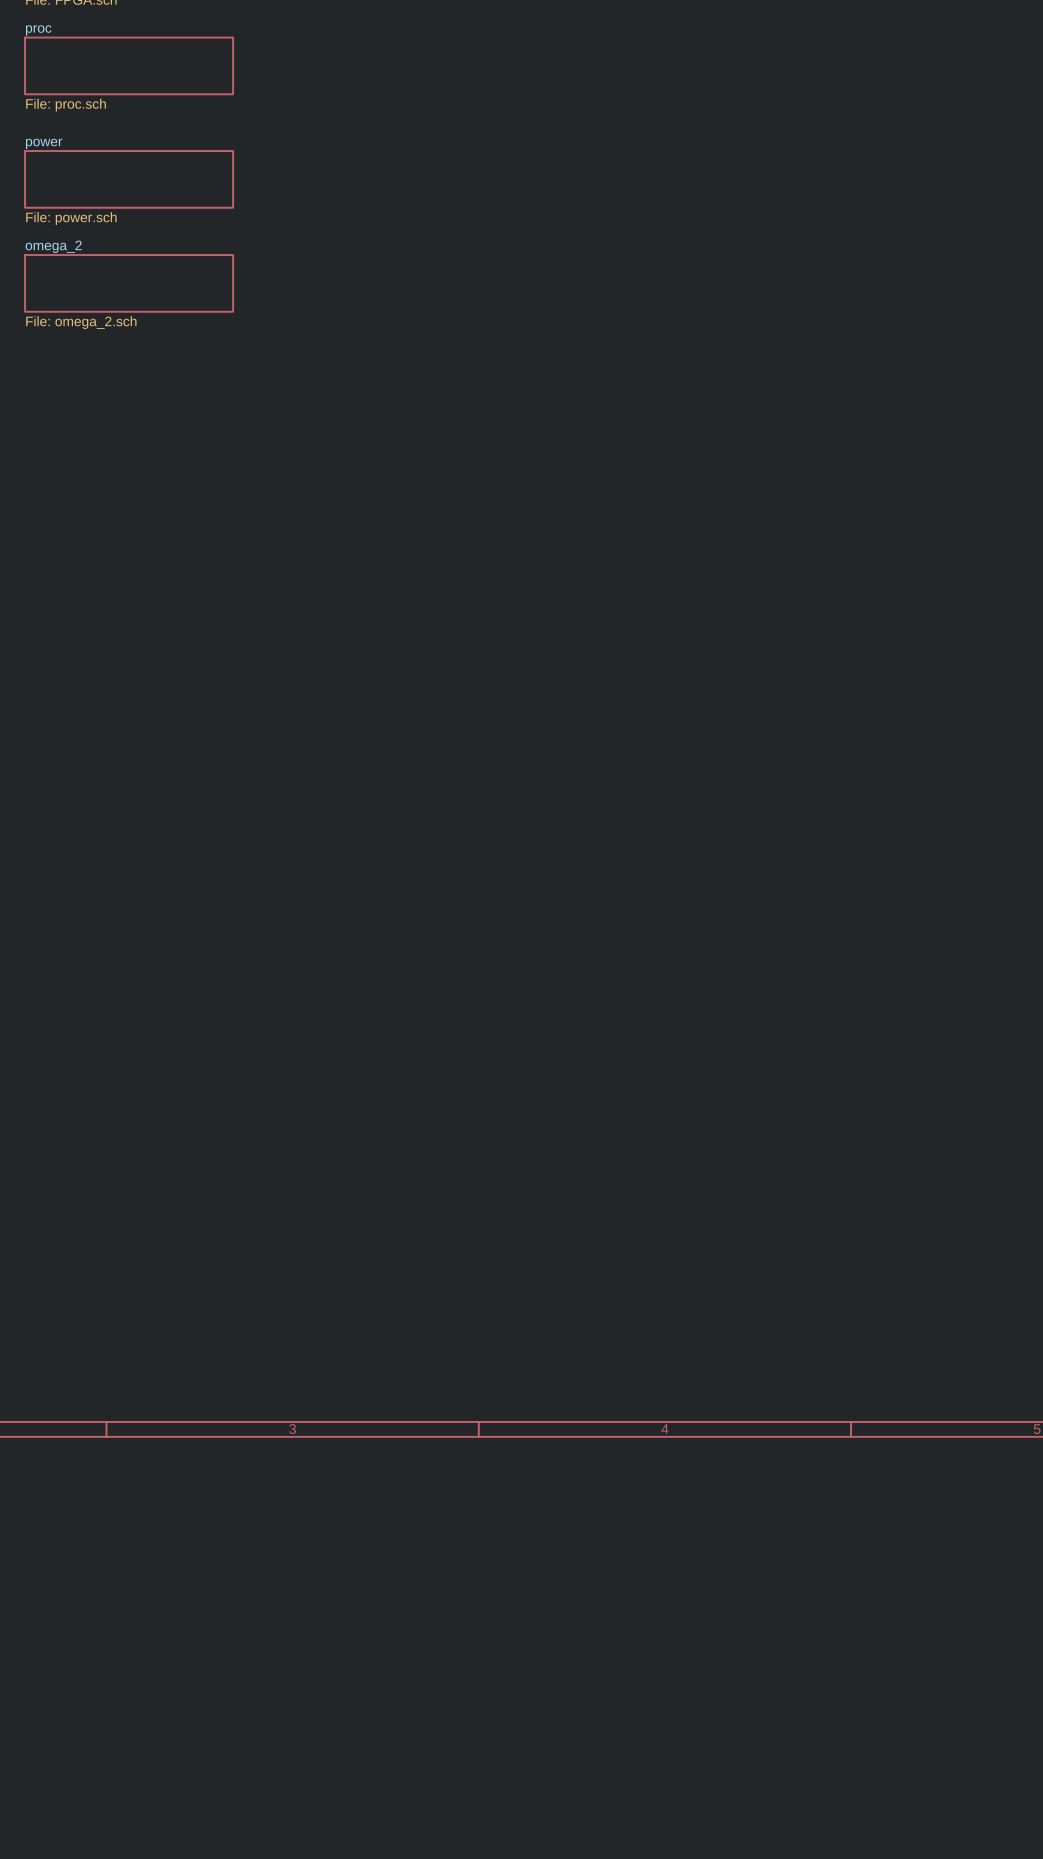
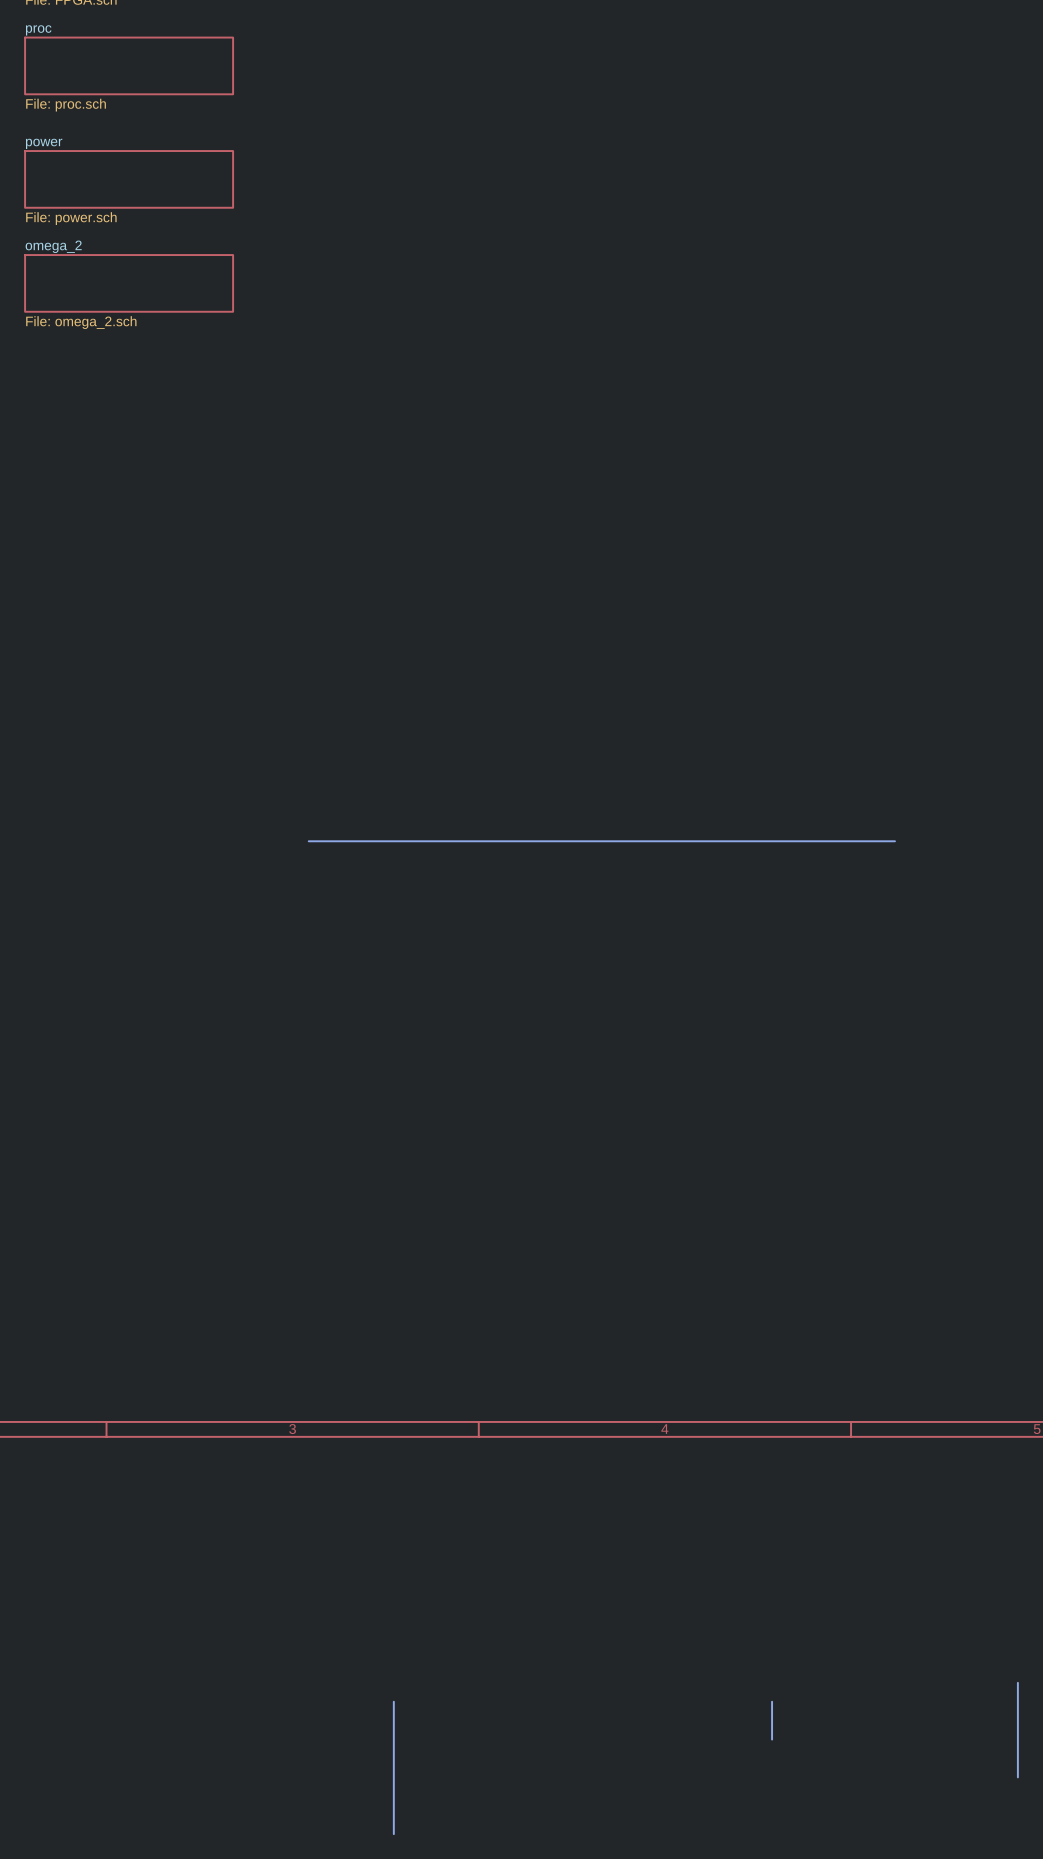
bus: none -> (308, 841) (894, 841)
bus: none -> (1017, 1682) (1017, 1777)
bus: none -> (393, 1701) (393, 1834)
bus: none -> (772, 1701) (772, 1739)

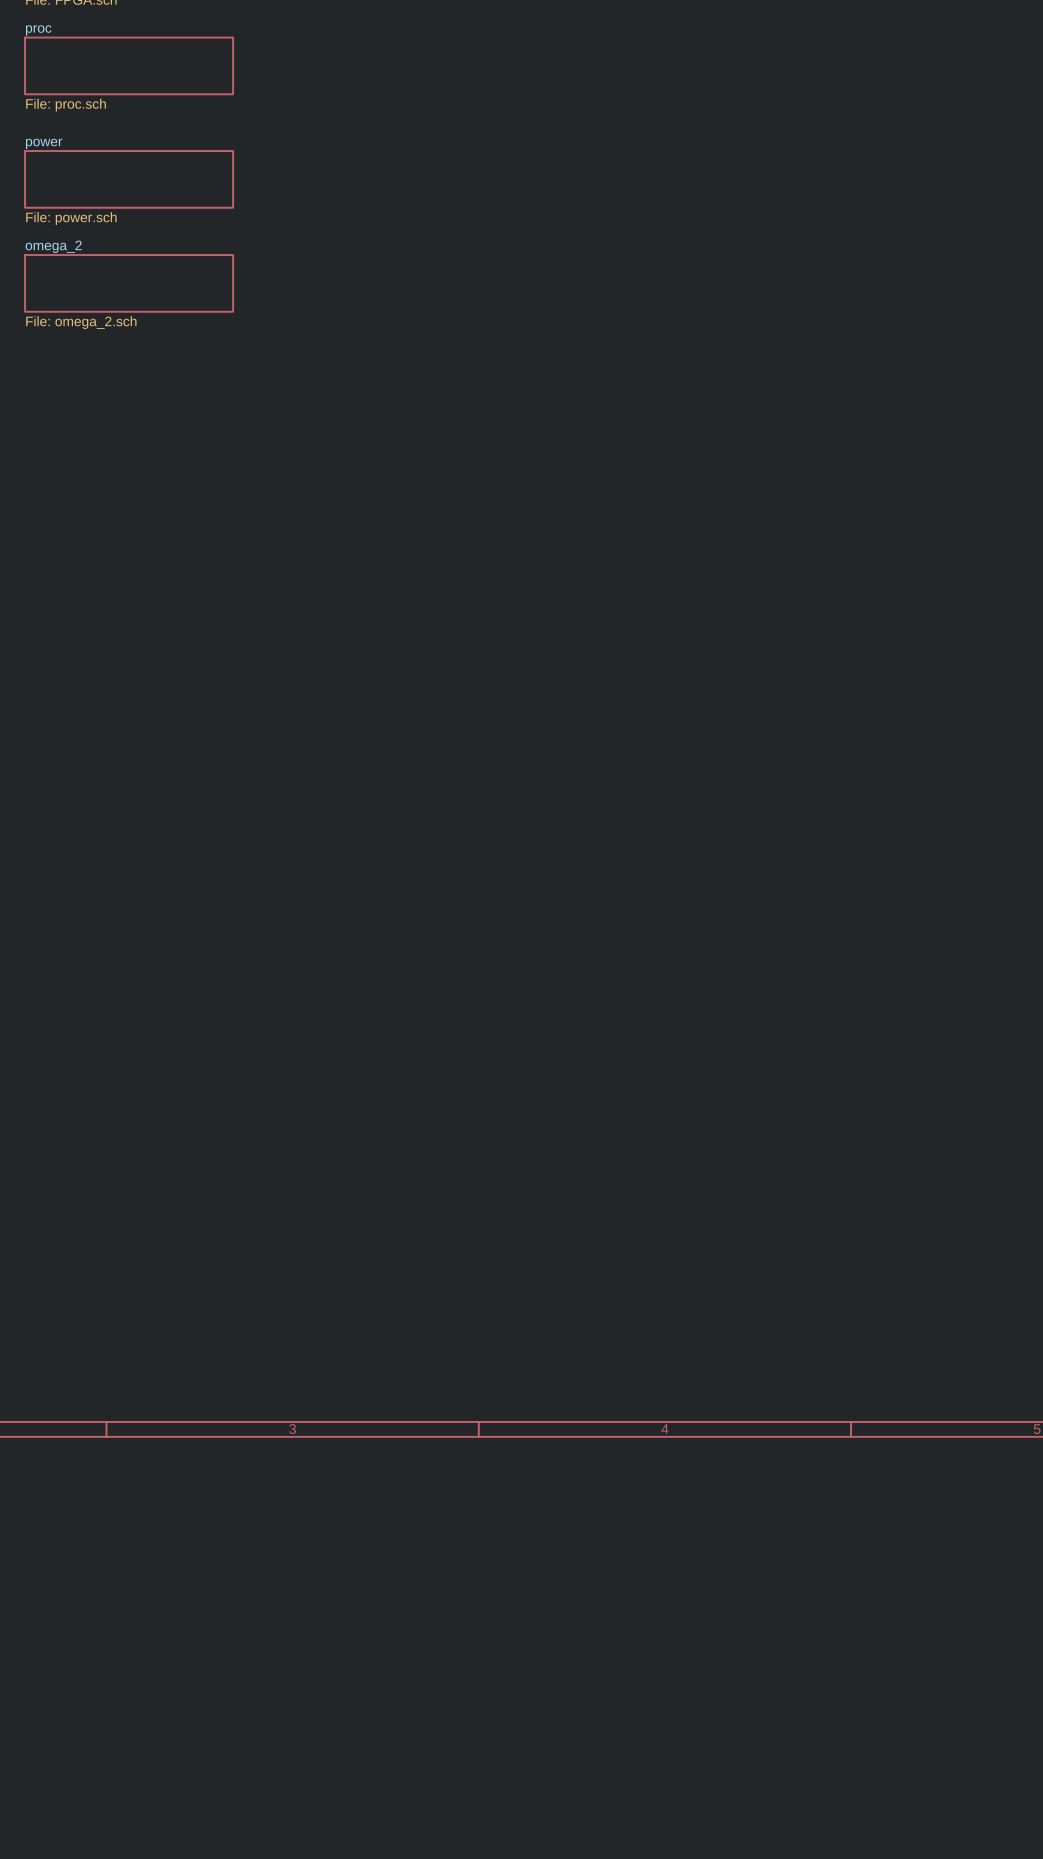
bus: (308, 841) (894, 841) -> none
bus: (1017, 1682) (1017, 1777) -> none
bus: (393, 1701) (393, 1834) -> none
bus: (772, 1701) (772, 1739) -> none

